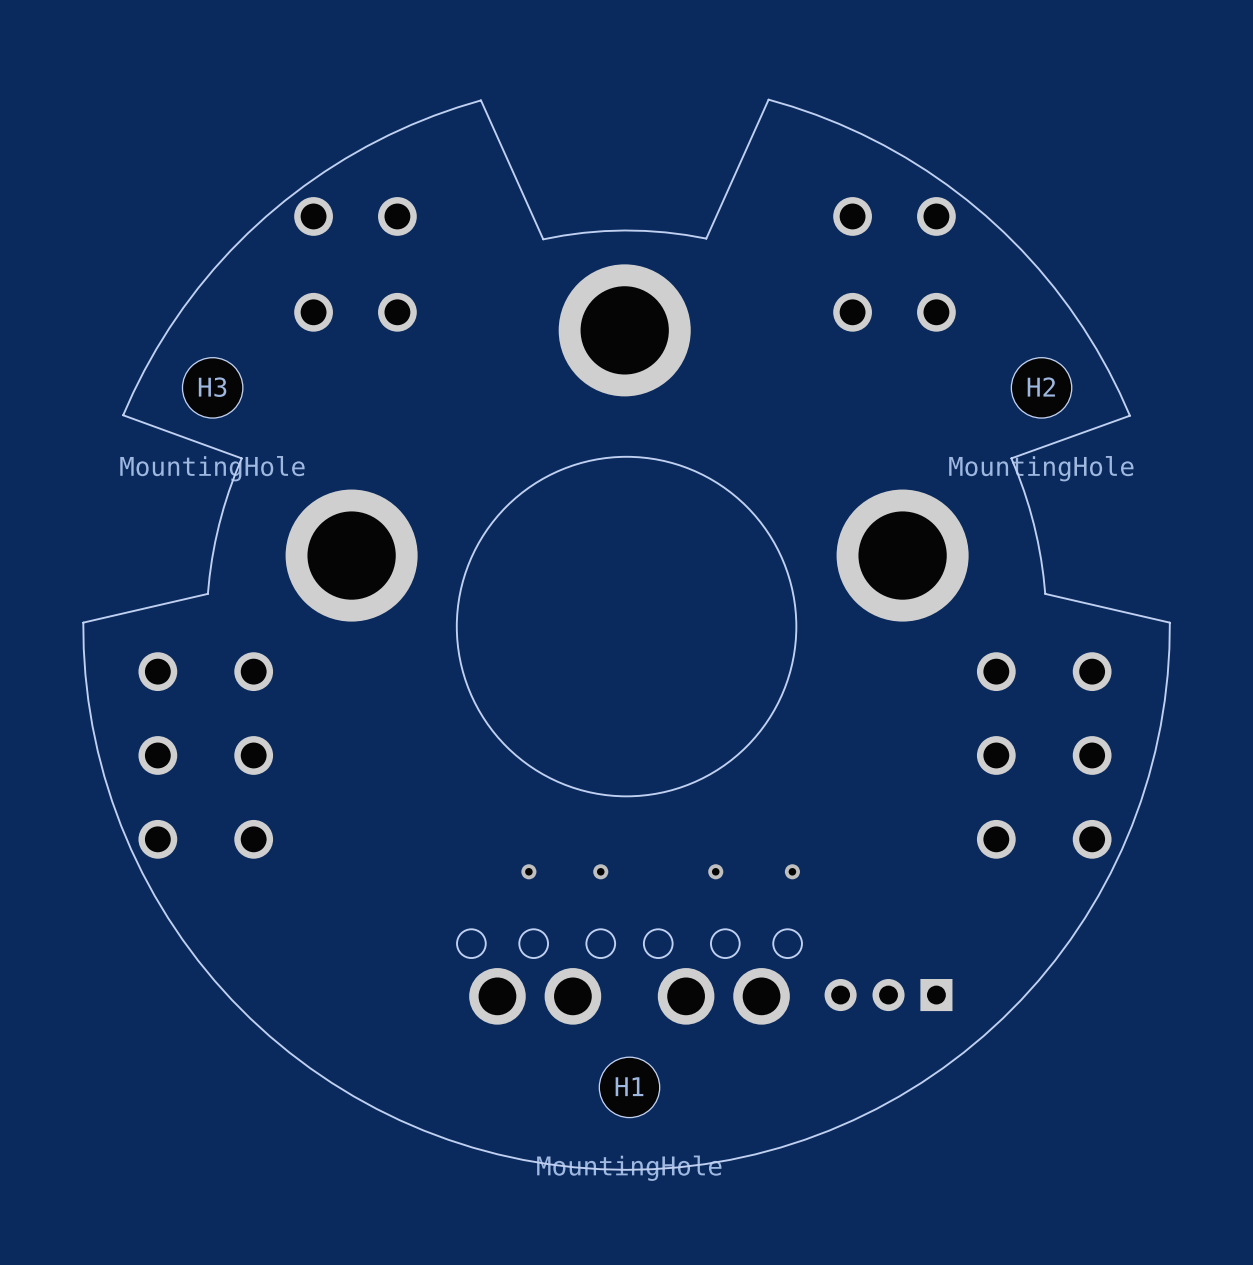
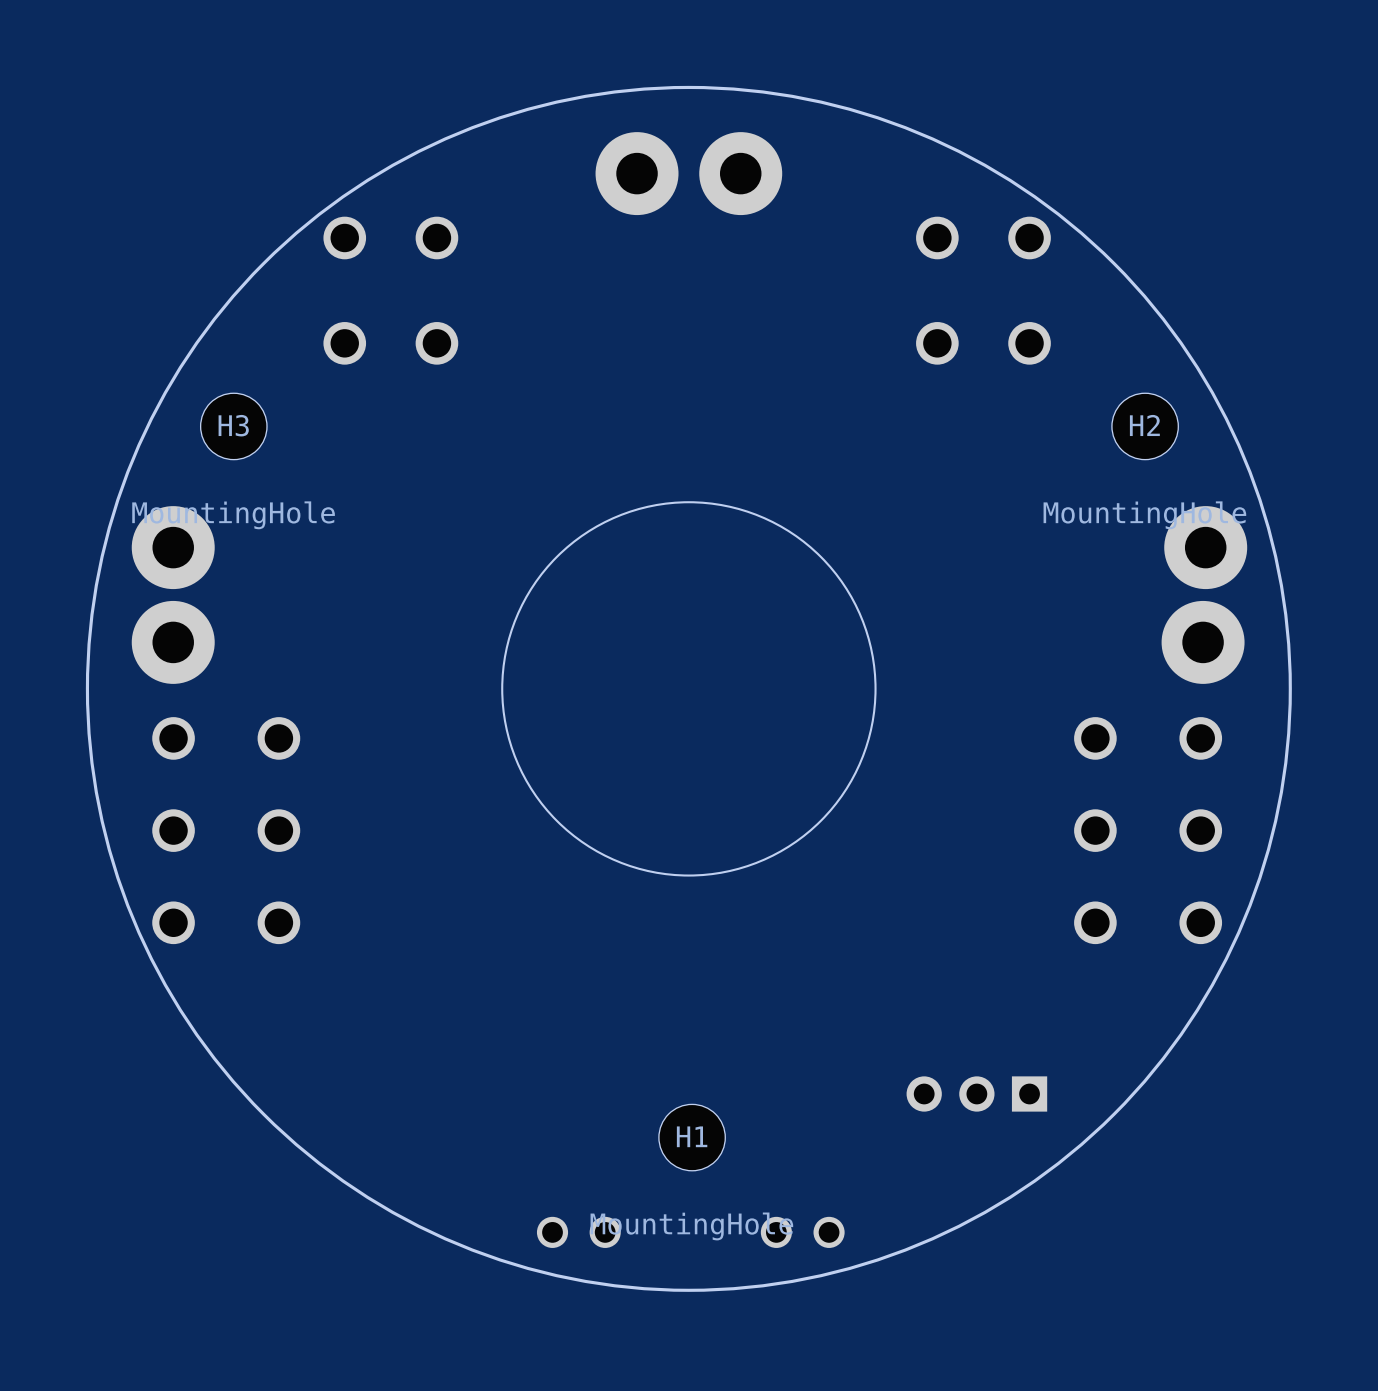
round board edge: none -> [85, 85, 1292, 1292]
board edge: (768, 99) (706, 238) (665, 232) (624, 230) (583, 232) (543, 239) (480, 100) (434, 115) (388, 135) (345, 158) (304, 185) (265, 216) (230, 250) (198, 288) (169, 328) (144, 370) (123, 415) (241, 458) (219, 524) (207, 593) (83, 622) (85, 674) (92, 725) (112, 801) (131, 849) (154, 895) (182, 939) (231, 1000) (269, 1035) (310, 1068) (353, 1096) (423, 1130) (472, 1147) (523, 1159) (574, 1167) (626, 1169) (678, 1167) (729, 1159) (780, 1147) (829, 1130) (876, 1108) (921, 1082) (963, 1052) (1002, 1018) (1038, 980) (1070, 939) (1110, 873) (1132, 825) (1148, 776) (1164, 700) (1169, 622) (1045, 593) (1034, 524) (1011, 458) (1129, 415) (1096, 349) (1069, 307) (1038, 268) (1004, 232) (966, 199) (926, 170) (883, 145) (839, 123) (768, 99) -> none
part: none -> (637, 173)
part: none -> (740, 173)
part: (624, 330) -> none
part: none -> (173, 547)
part: none -> (1205, 547)
part: (351, 555) -> none
part: (902, 555) -> none
part: none -> (173, 642)
part: none -> (1203, 642)
via: (528, 871) -> none
via: (600, 871) -> none
via: (715, 871) -> none
via: (792, 871) -> none
round board edge: [456, 928, 487, 959] -> none
round board edge: [518, 928, 549, 959] -> none
round board edge: [585, 928, 617, 959] -> none
round board edge: [642, 928, 674, 959] -> none
round board edge: [710, 928, 741, 959] -> none
round board edge: [772, 928, 803, 959] -> none
part: (497, 996) -> none
part: (572, 996) -> none
part: (686, 996) -> none
part: (761, 996) -> none
H1 position: (629, 1087) -> (692, 1137)
part: none -> (552, 1232)
part: none -> (605, 1232)
part: none -> (776, 1232)
part: none -> (829, 1232)

